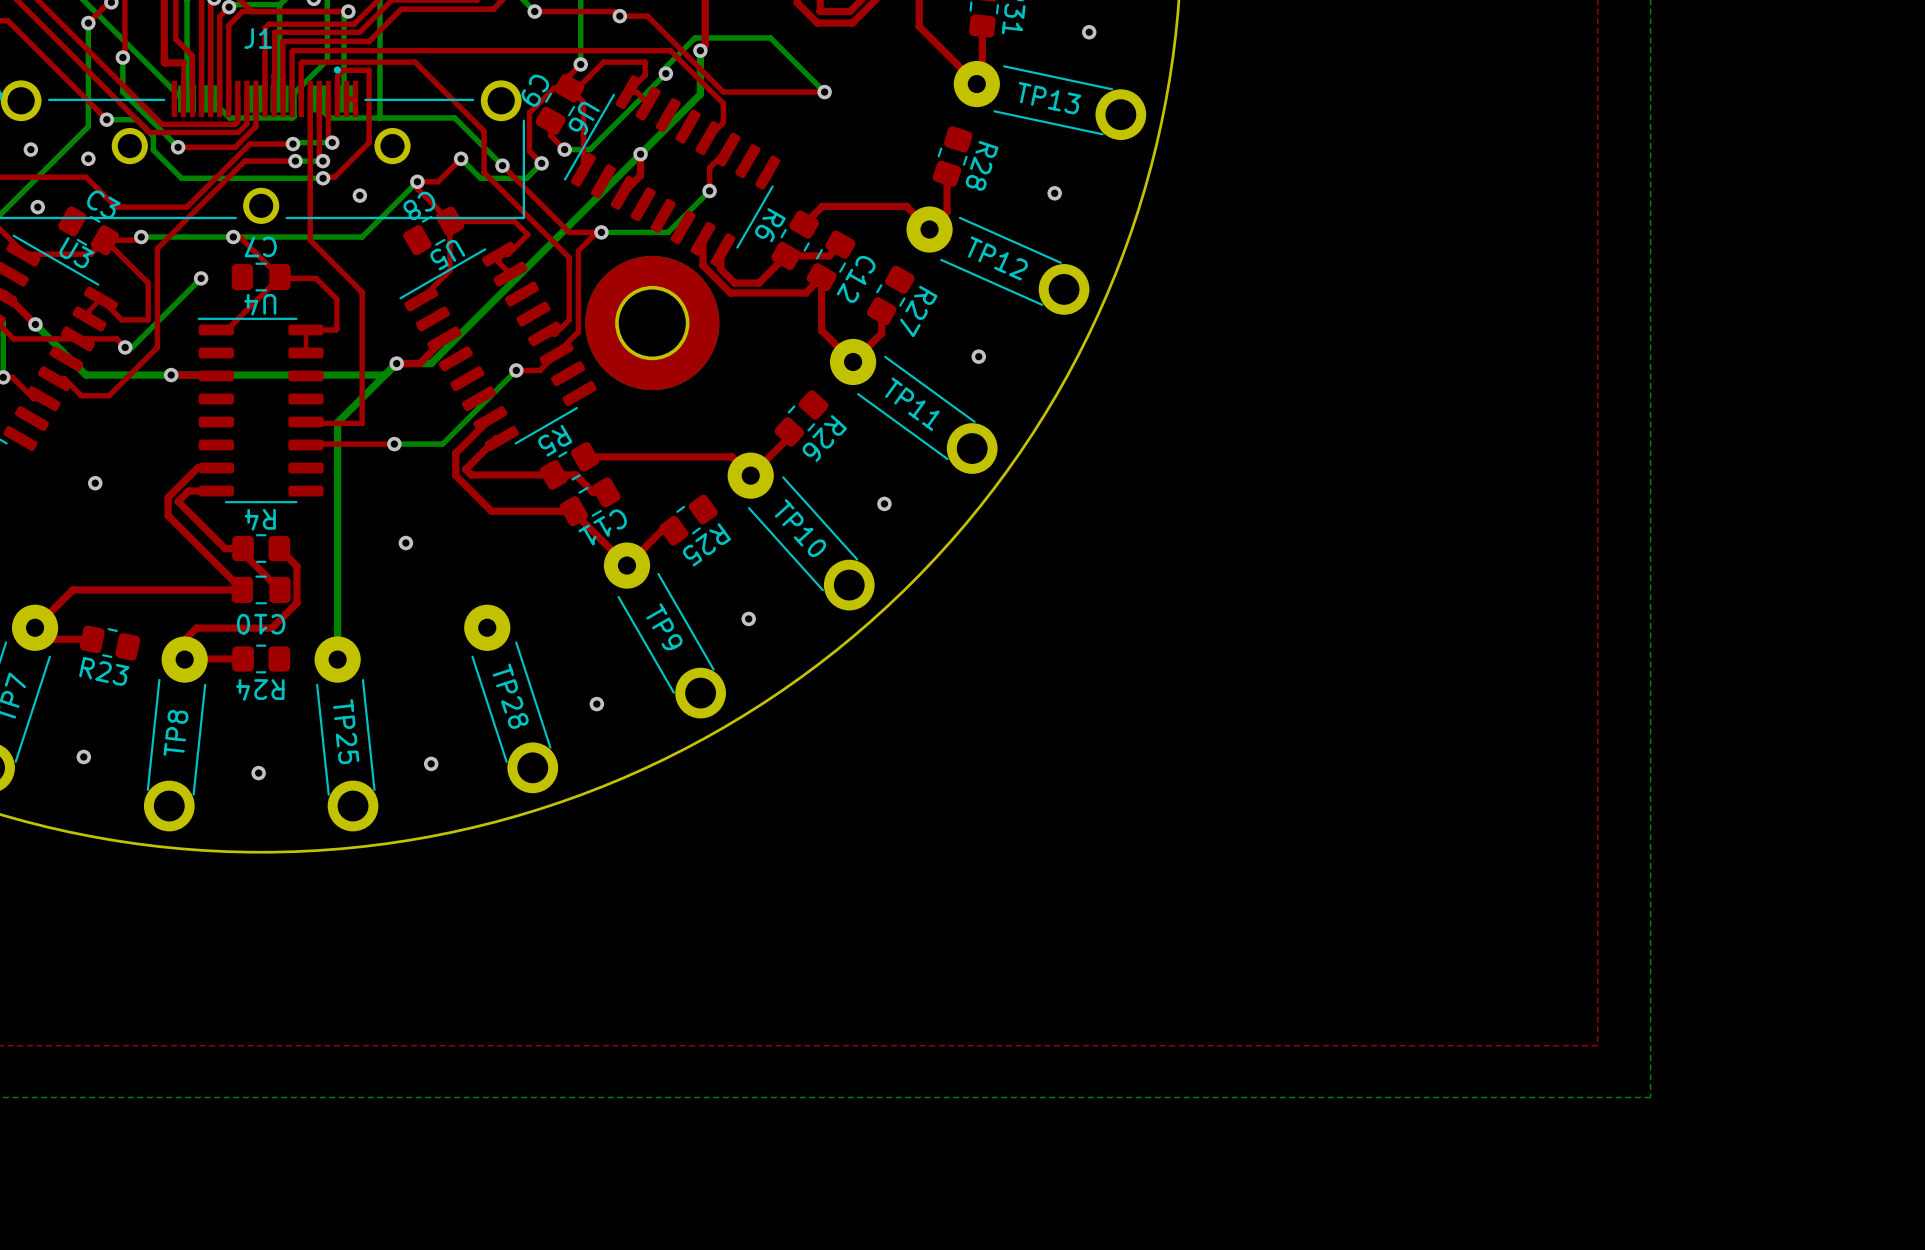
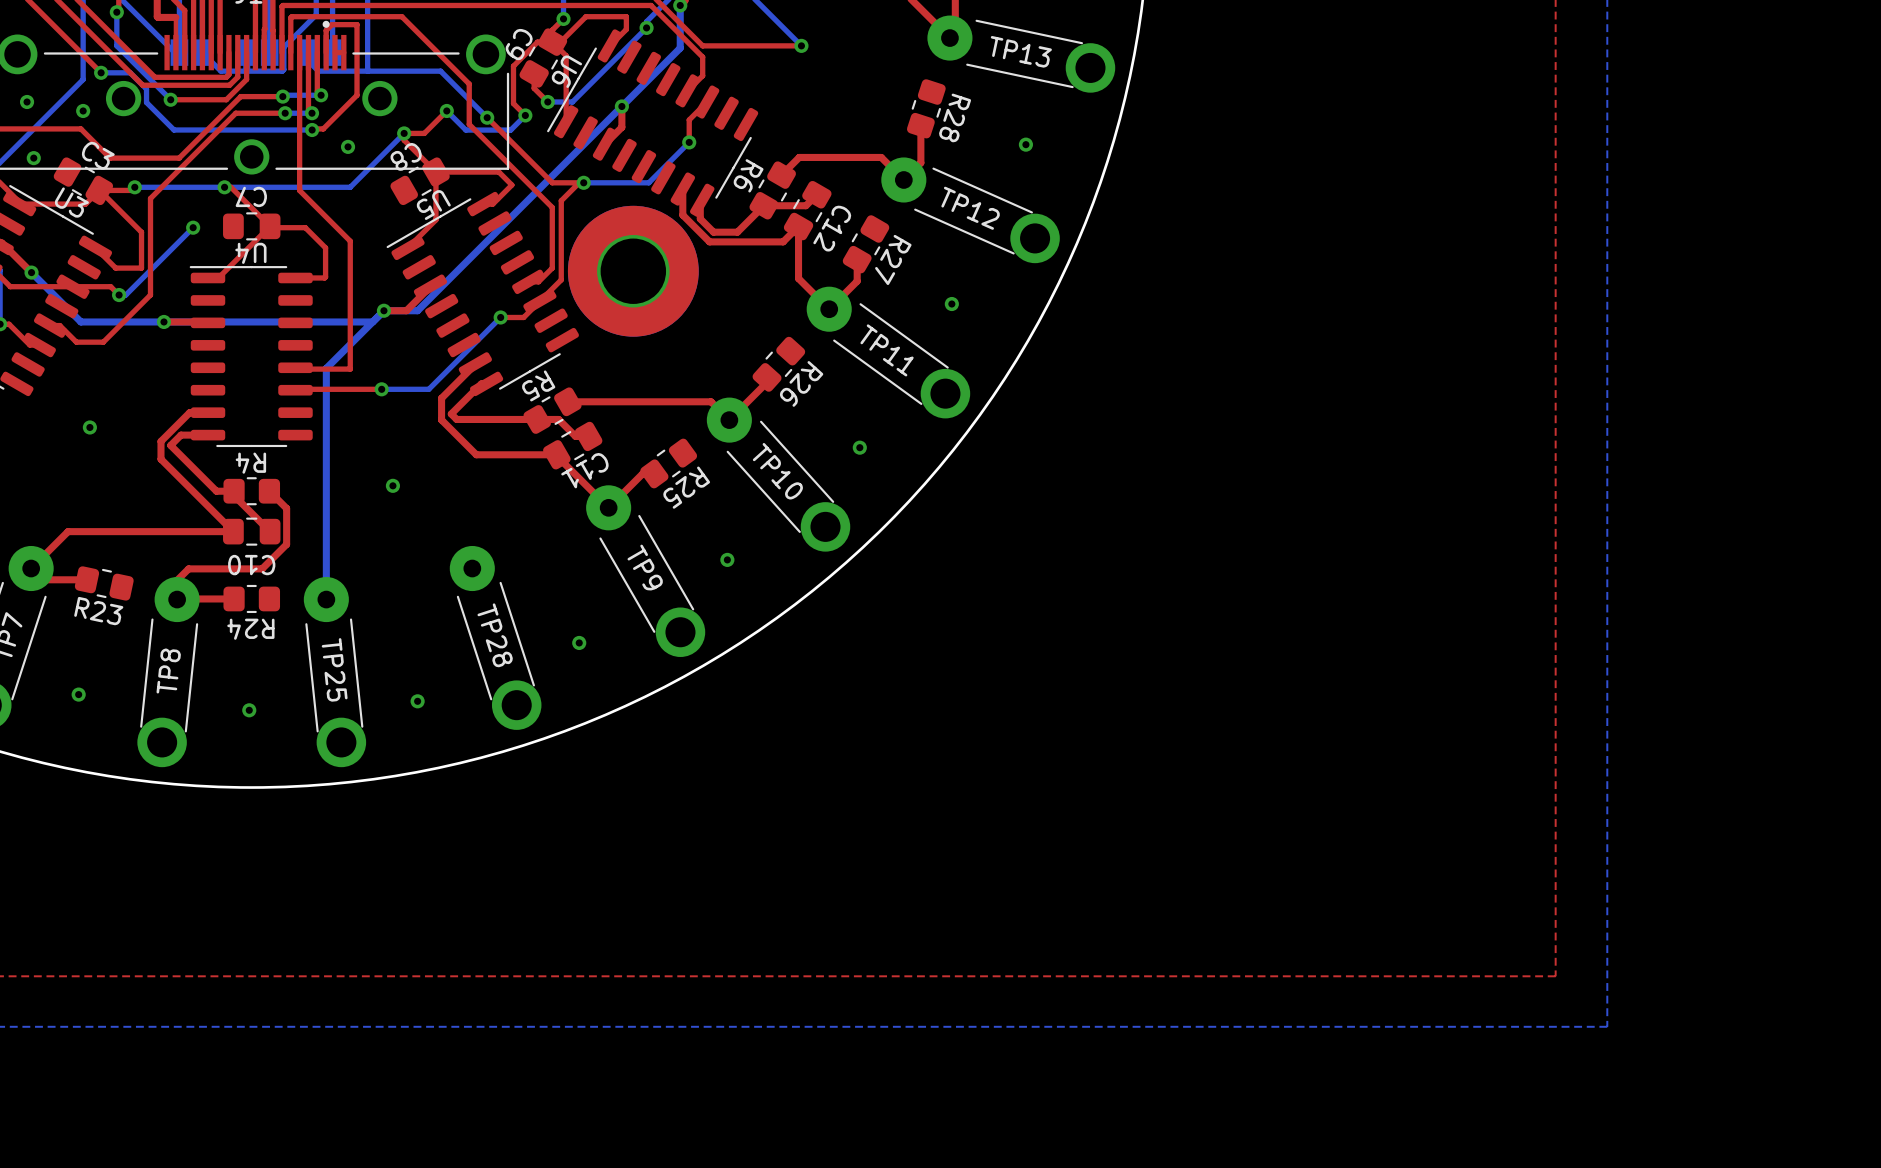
top track: (628, 92) (636, 92) (648, 103) -> none
top track: (499, 254) (499, 262) (510, 274) -> none
top track: (100, 299) (89, 310) (89, 318) -> none
top track: (306, 329) (306, 352) -> none

